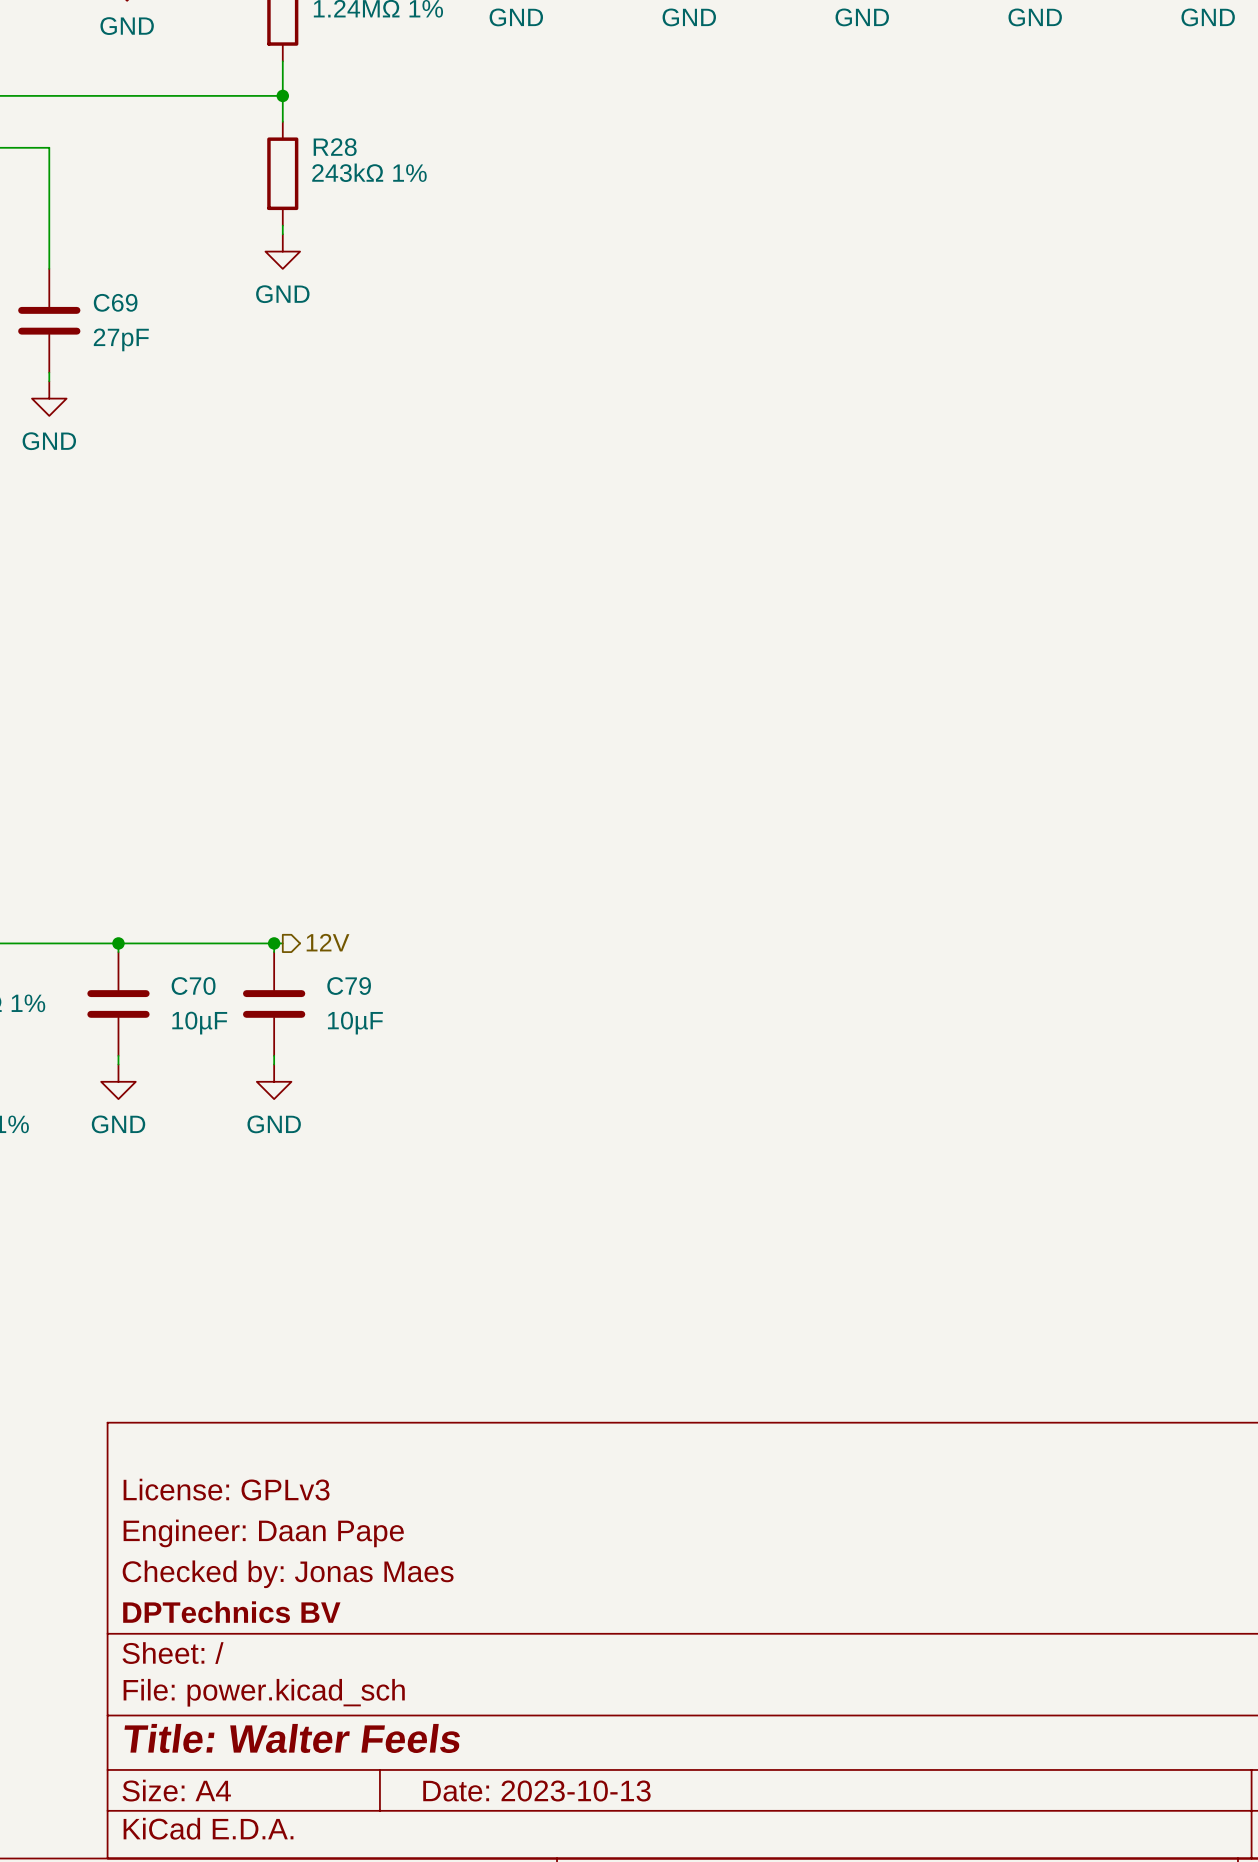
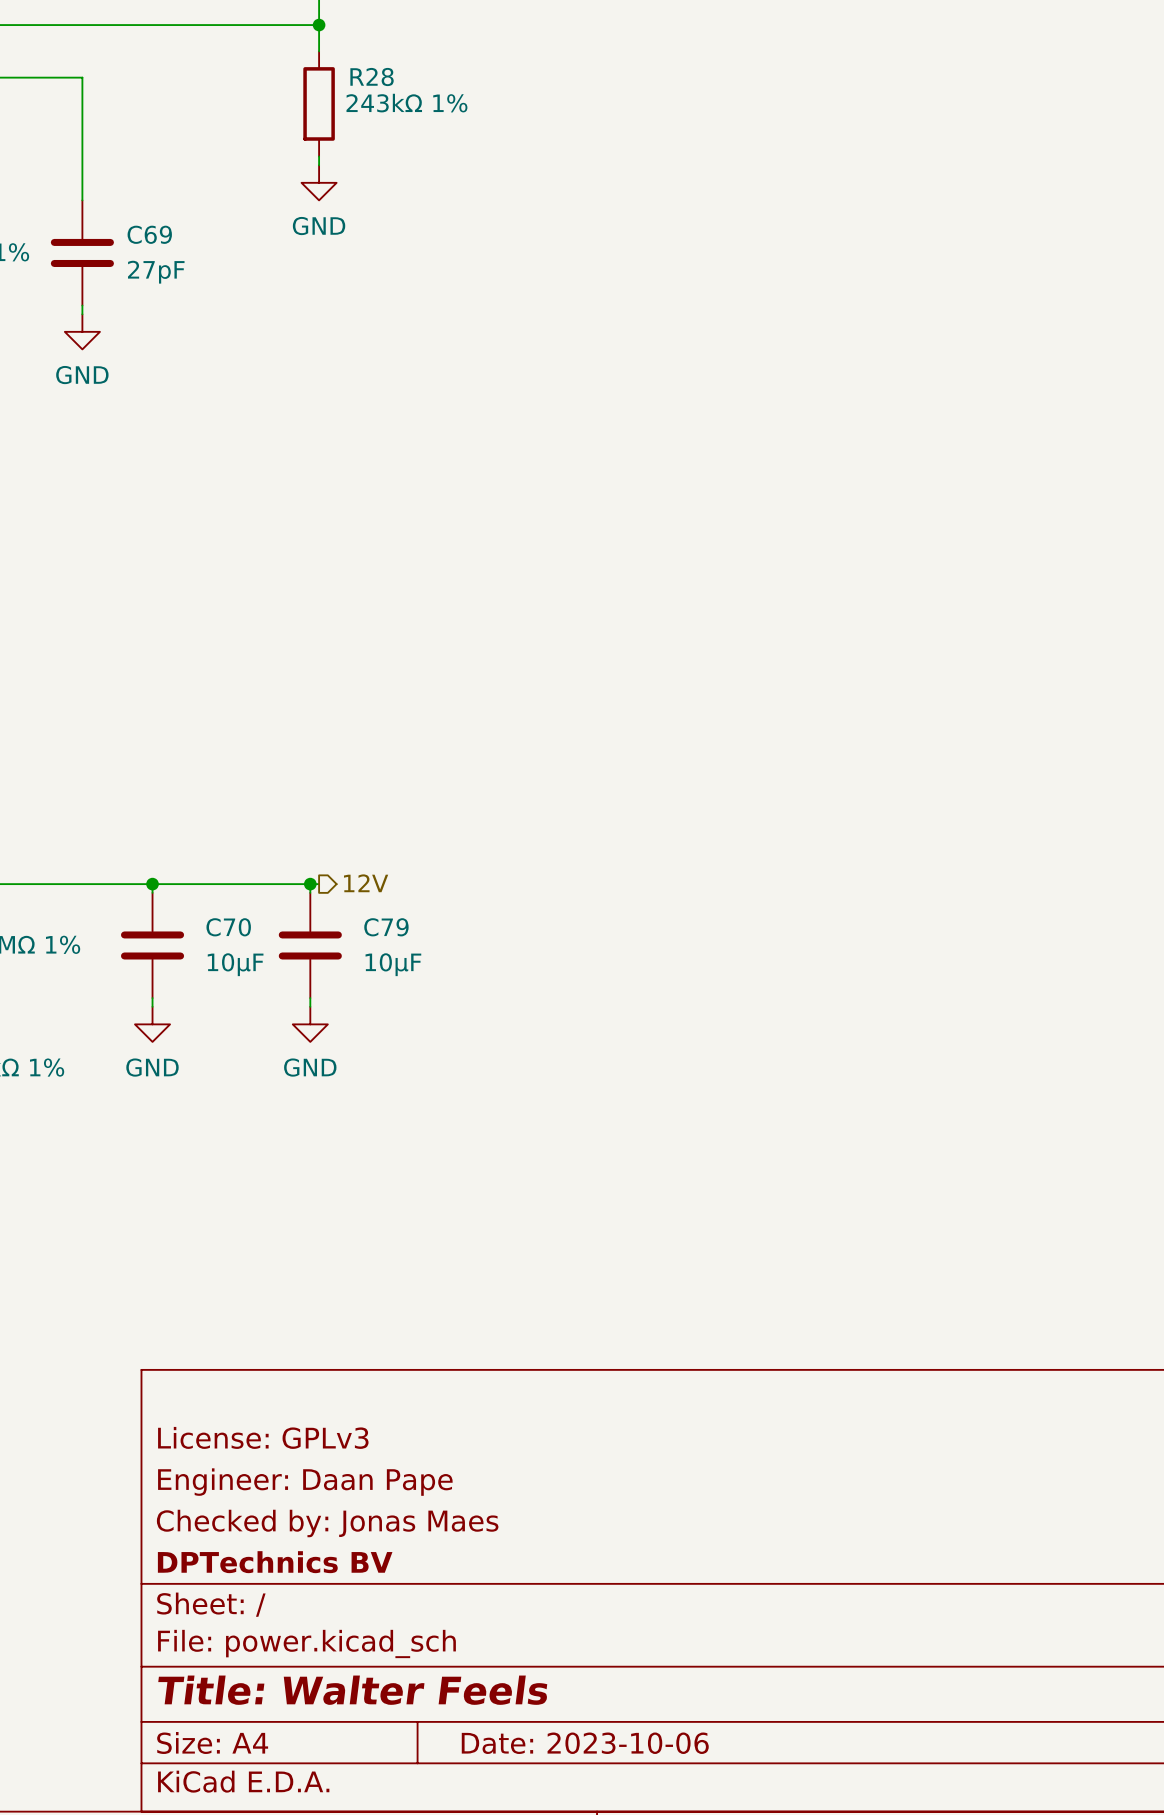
title block: Date: 2023-10-13 (536, 1791) -> Date: 2023-10-06 (585, 1743)

